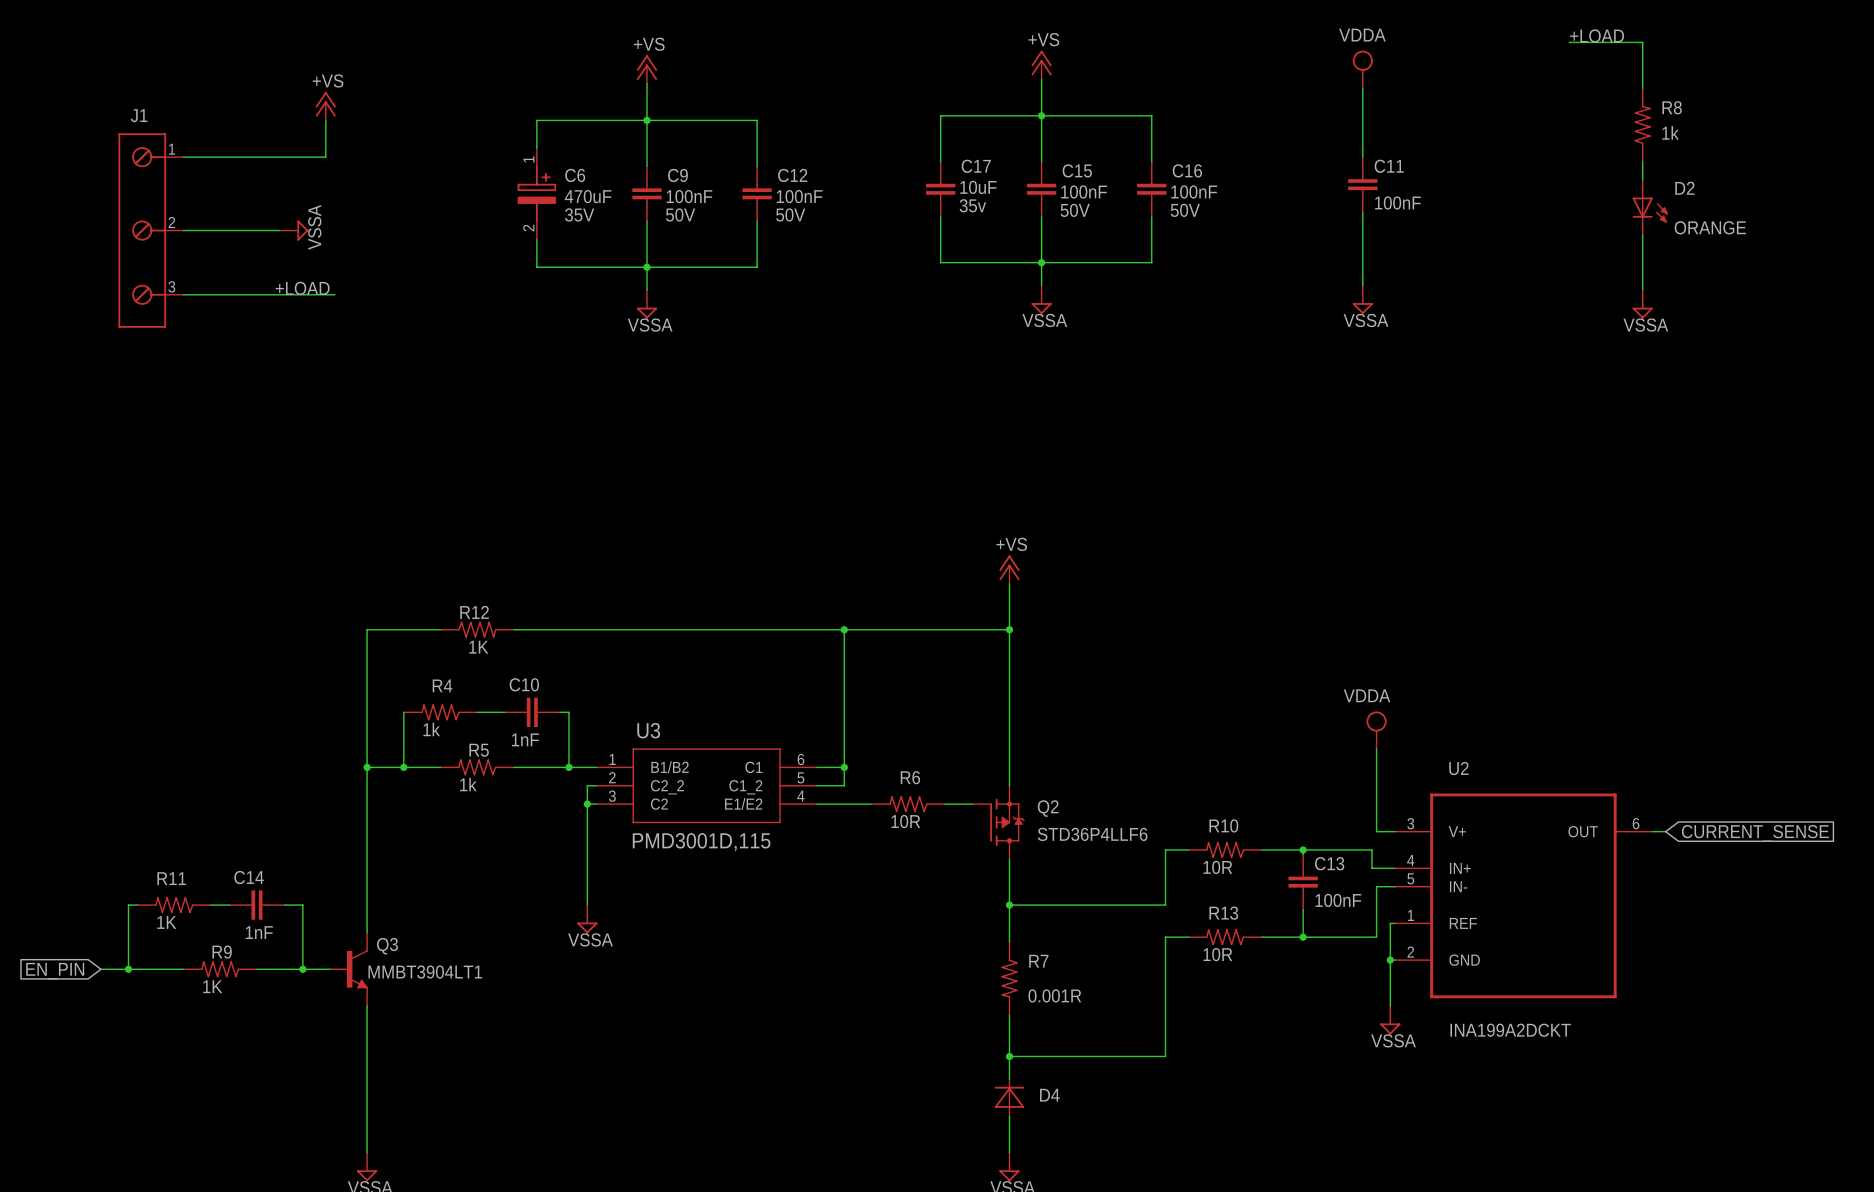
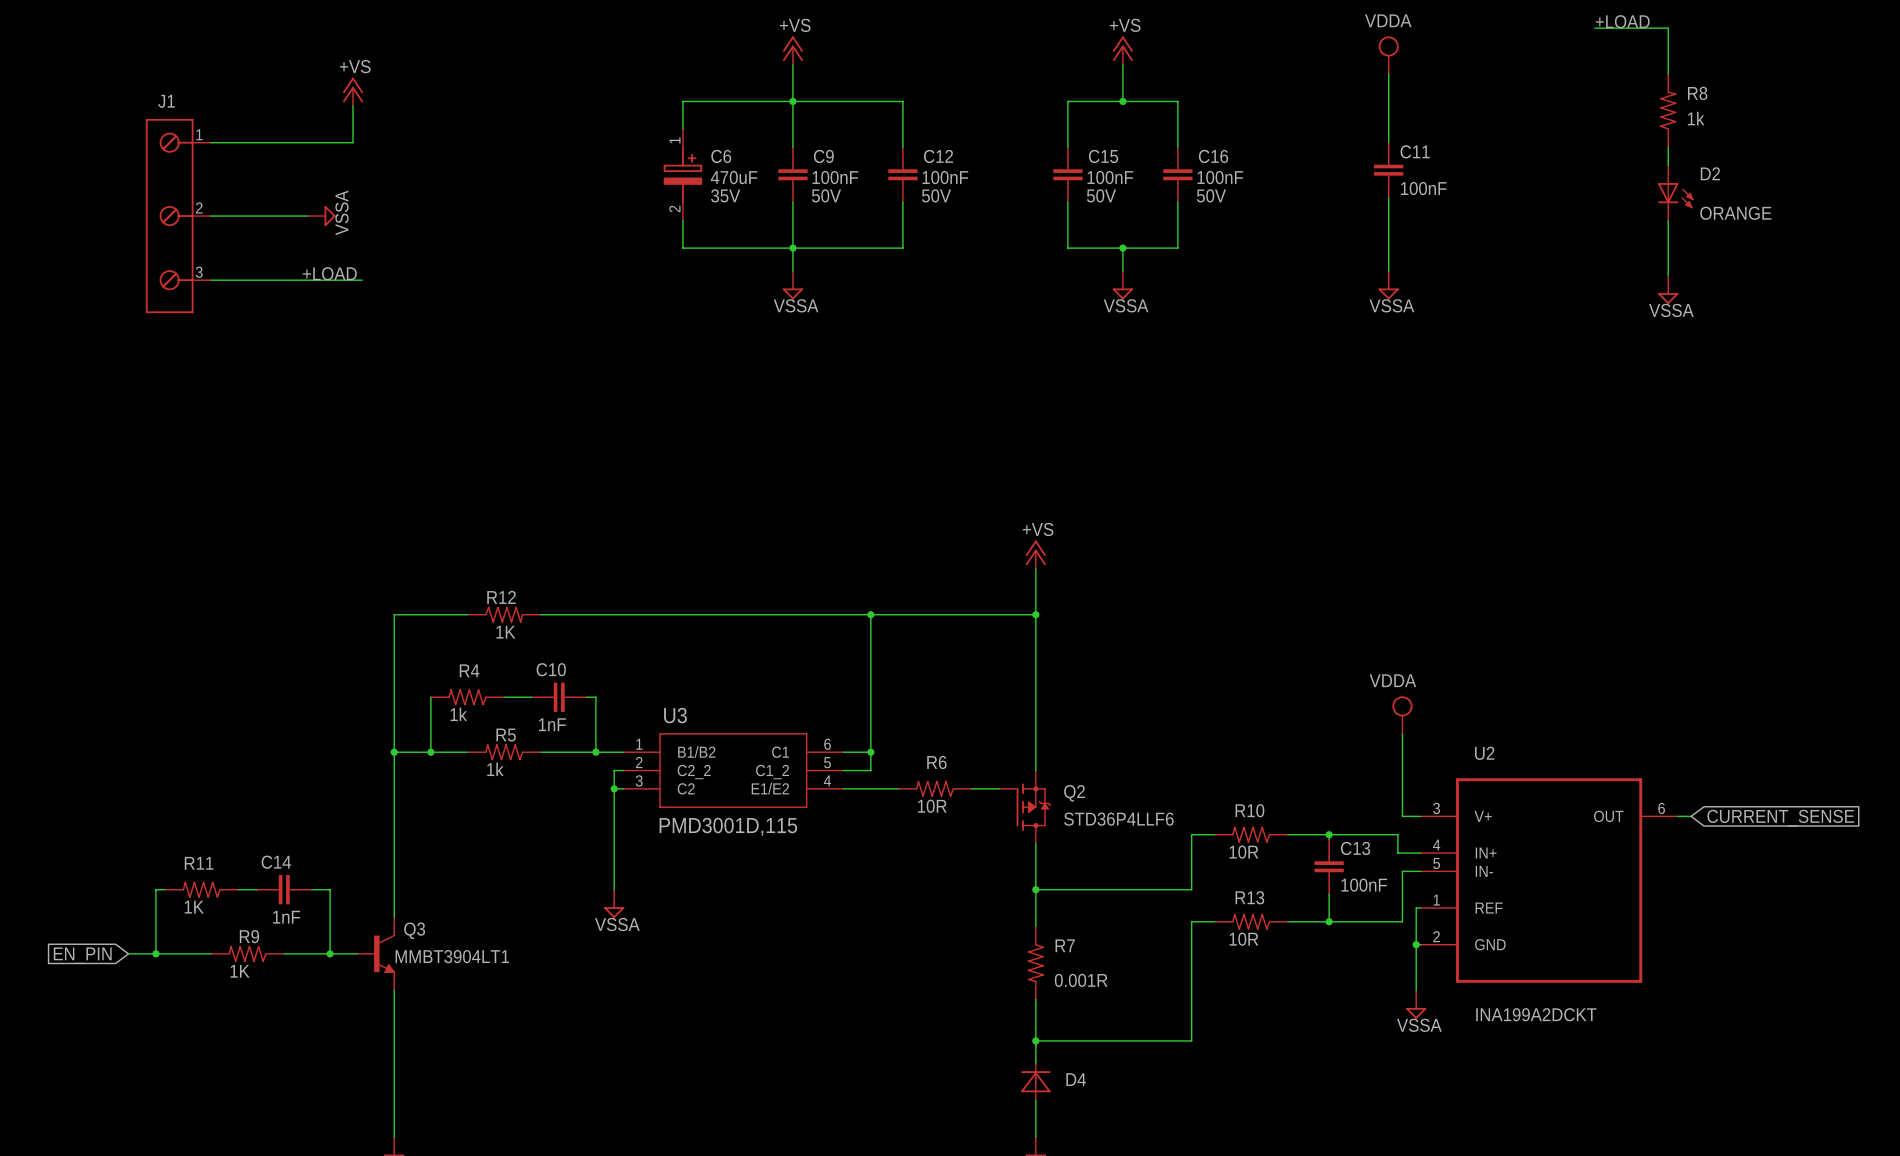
power symbol position: +VS (1041, 64) -> +VS (1122, 50)
power symbol position: +VS (646, 69) -> +VS (792, 50)
wire: (1041, 79) (1041, 115) (940, 115) (940, 161) -> none
wire: none -> (1122, 64) (1122, 101)
wire: (646, 83) (646, 166) -> (792, 64) (792, 147)
junction: none -> (792, 101)
junction: (1041, 115) -> none
junction: none -> (1122, 101)
junction: (646, 120) -> none
wire: (536, 147) (536, 120) (757, 120) (757, 166) -> (682, 128) (682, 101) (902, 101) (902, 147)
C17: (940, 189) -> none
C6 position: (536, 193) -> (682, 174)
C9 position: (646, 193) -> (792, 174)
C12 position: (757, 193) -> (902, 174)
wire: (940, 216) (940, 262) (1041, 262) (1041, 285) -> none
wire: (646, 221) (646, 290) -> (792, 202) (792, 271)
wire: (757, 221) (757, 267) (536, 267) (536, 239) -> (902, 202) (902, 248) (682, 248) (682, 220)
junction: none -> (792, 248)
junction: (1041, 262) -> none
wire: none -> (1122, 248) (1122, 271)
junction: none -> (1122, 248)
junction: (646, 267) -> none
power symbol position: VSSA (1041, 299) -> VSSA (1122, 285)
power symbol position: VSSA (646, 304) -> VSSA (792, 285)

